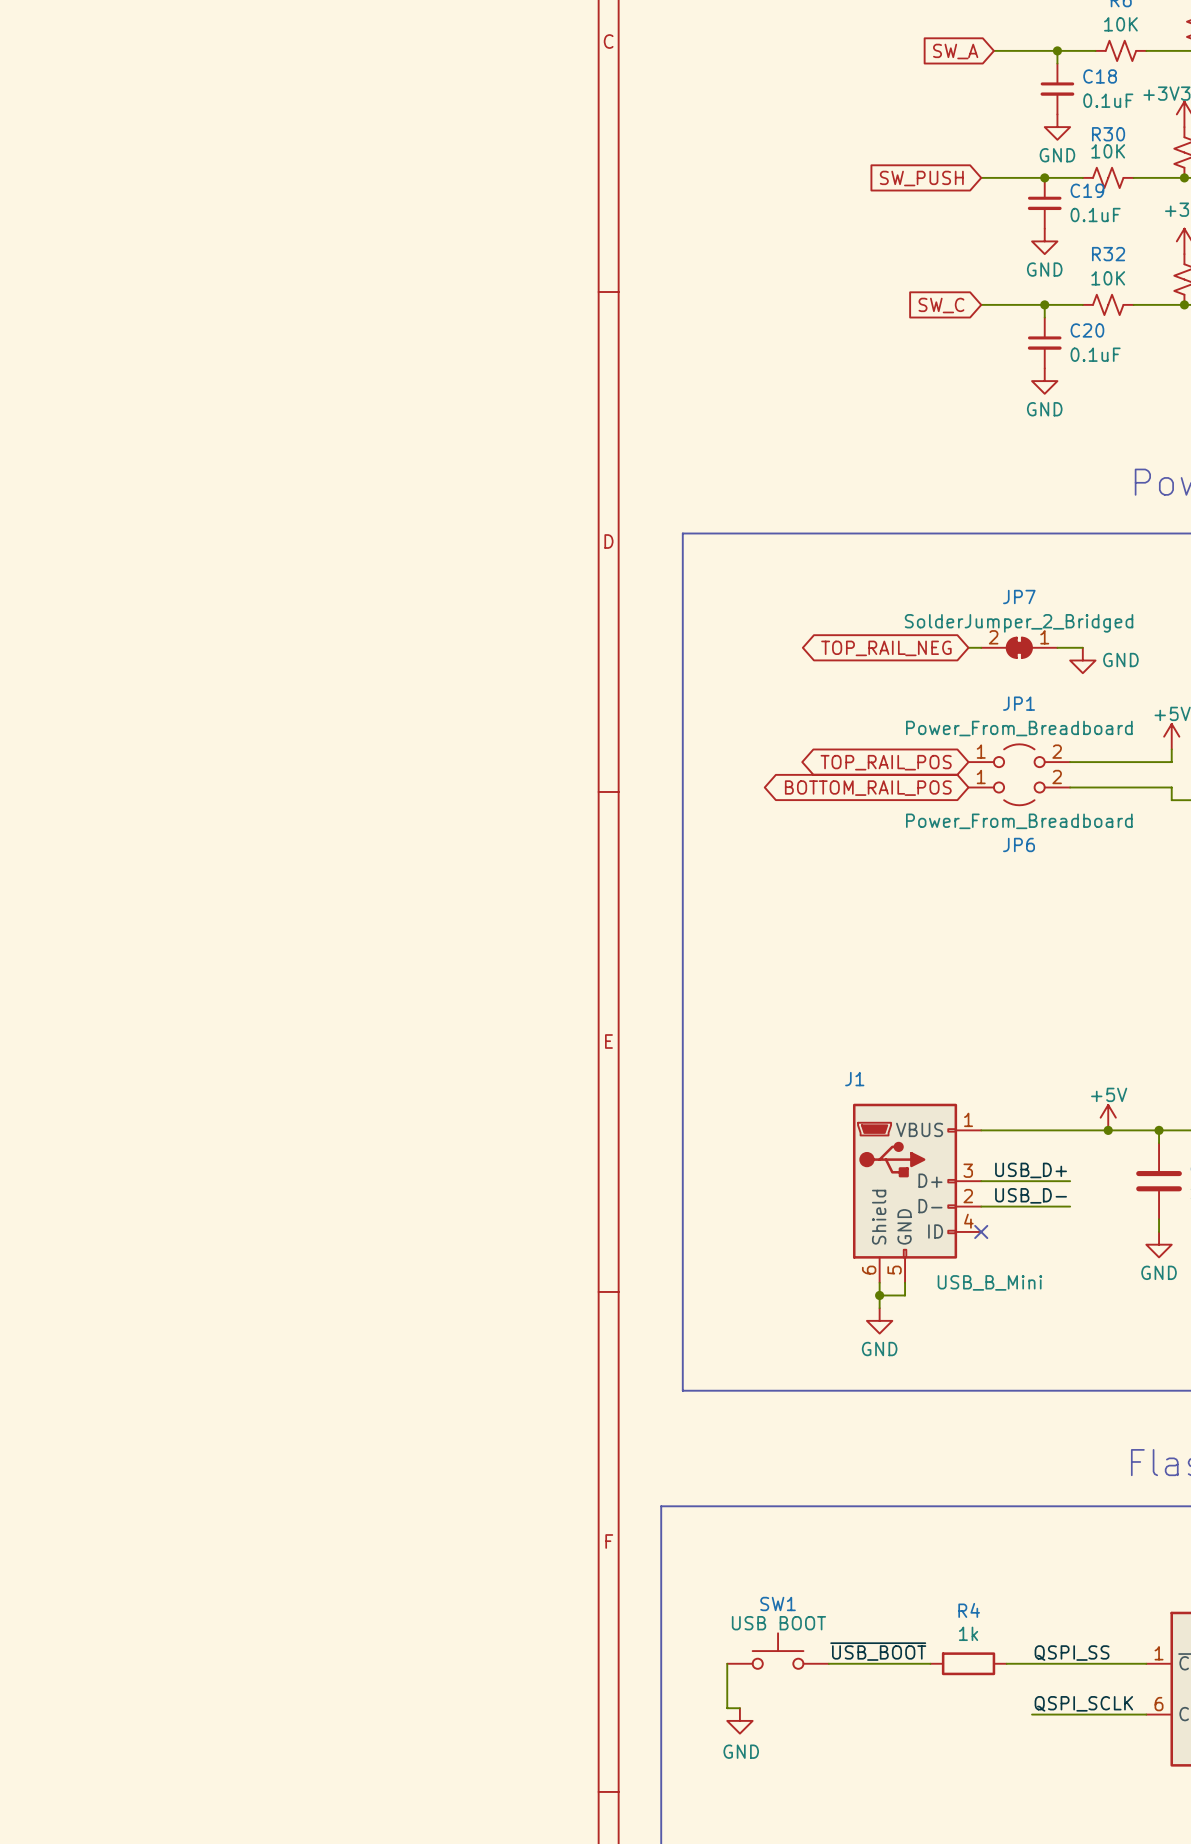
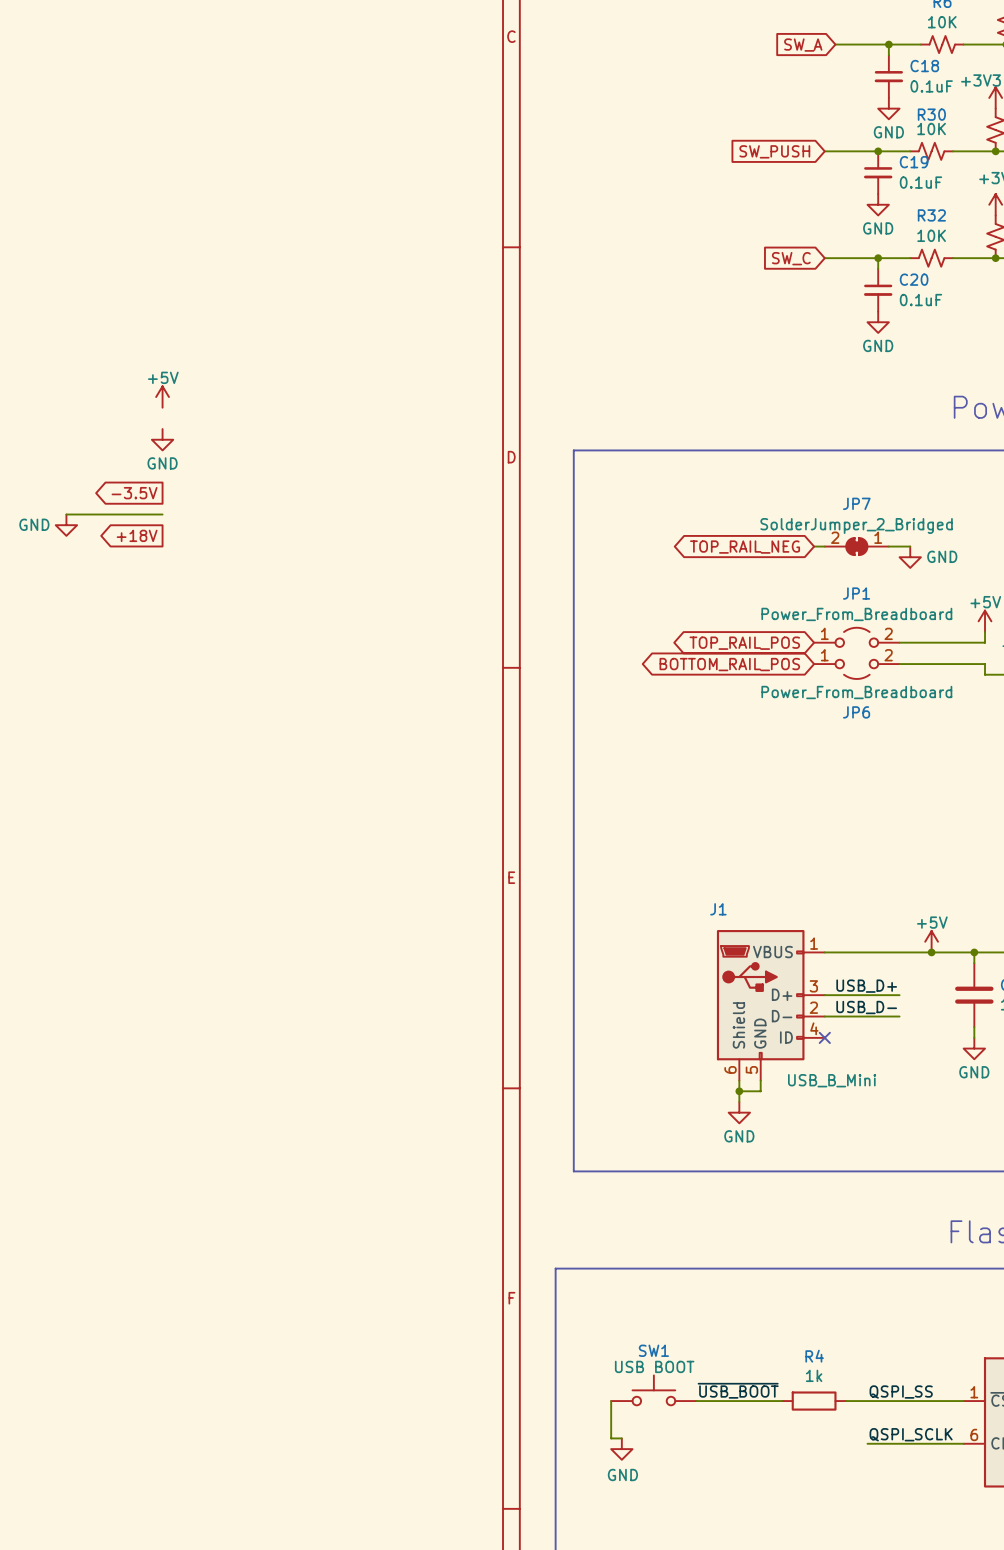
power symbol: none -> +5V (162, 397)
power symbol: none -> GND (162, 439)
global label: none -> -3.5V (134, 493)
wire: none -> (66, 514) (162, 514)
power symbol: none -> GND (66, 525)
global label: none -> +18V (137, 535)

